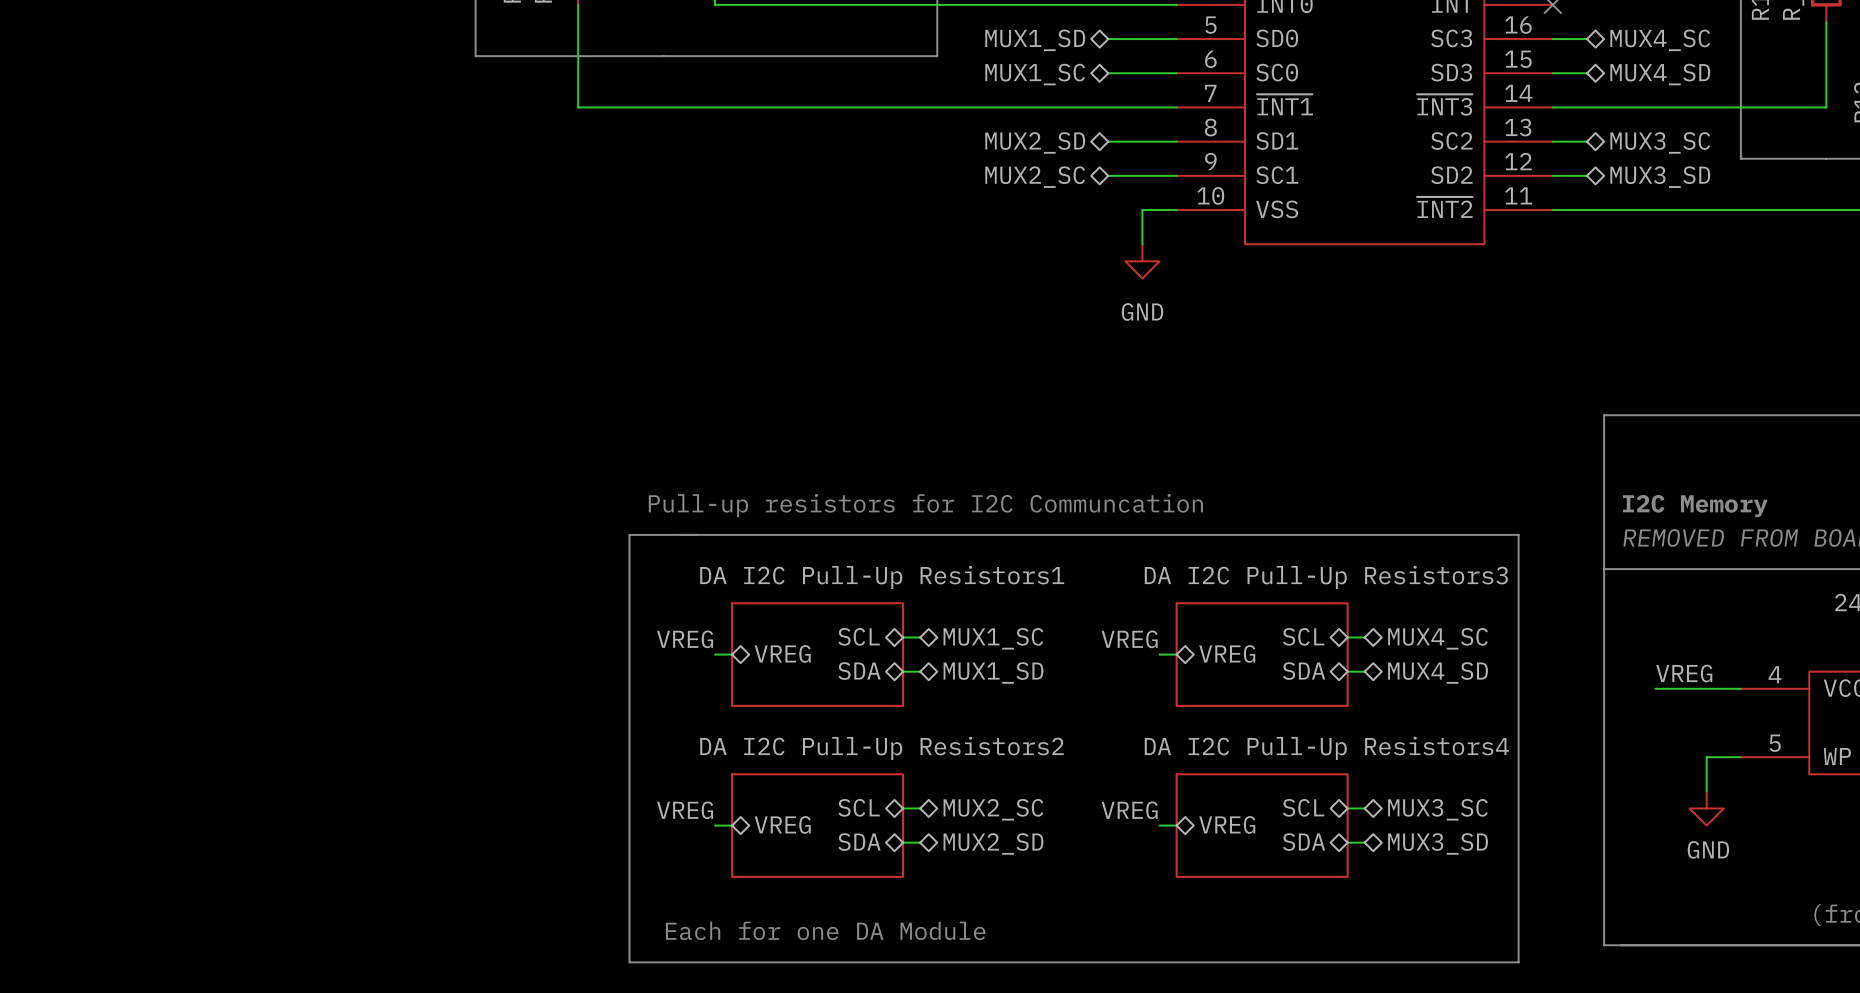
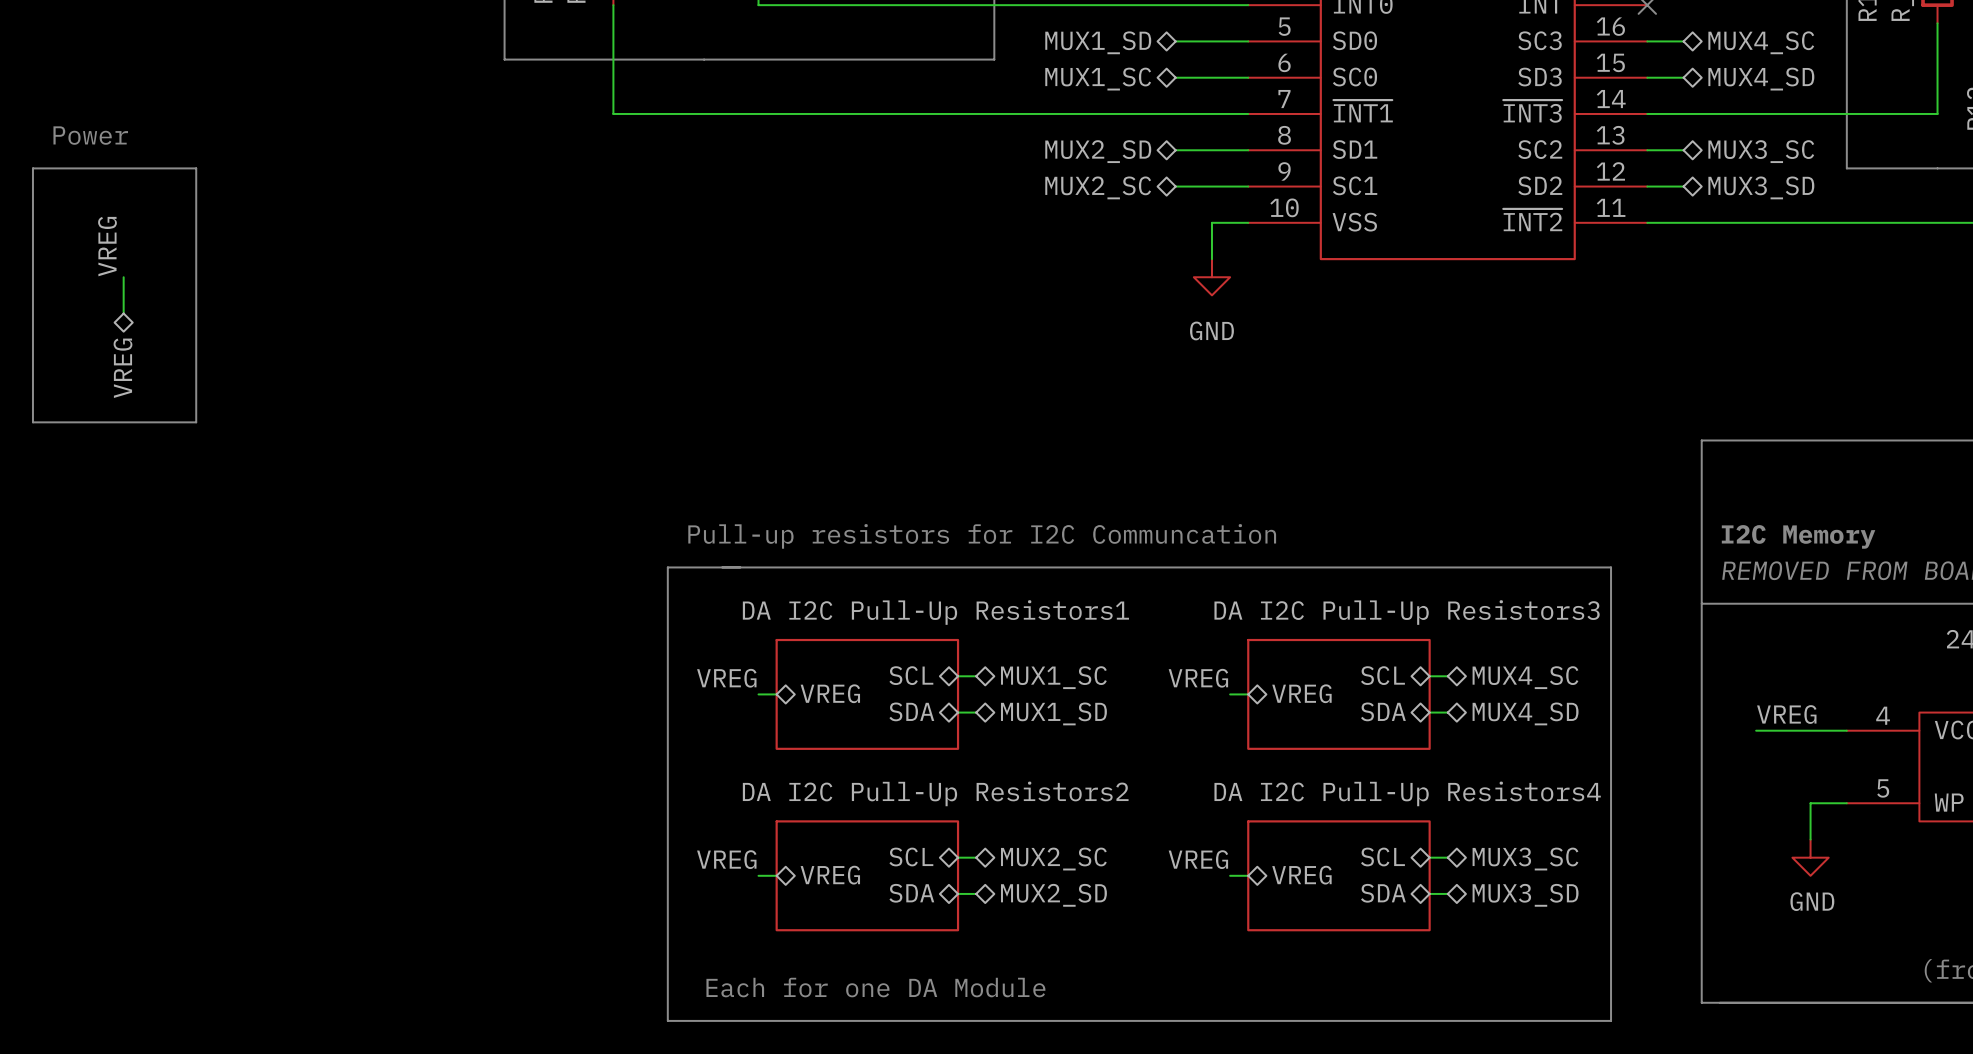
text: none -> Power (90, 135)
line: none -> (32, 168) (196, 168) (196, 422) (32, 422) (32, 168)
label: none -> VREG (107, 246)
wire: none -> (123, 277) (123, 313)
hierarchical label: none -> VREG (122, 368)

